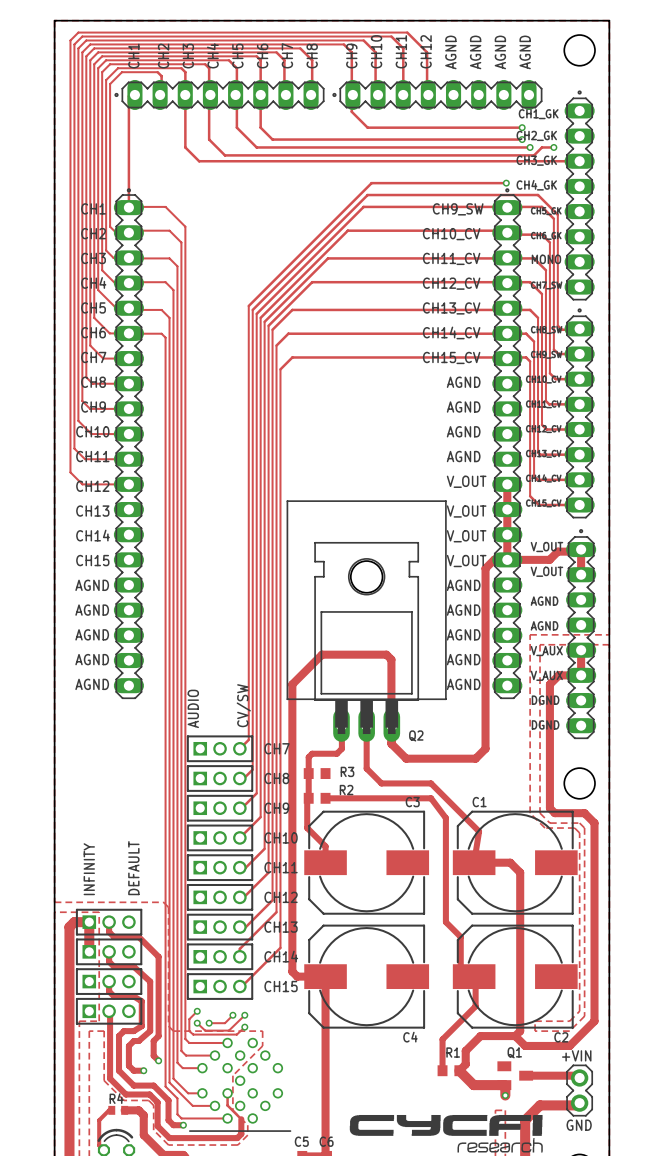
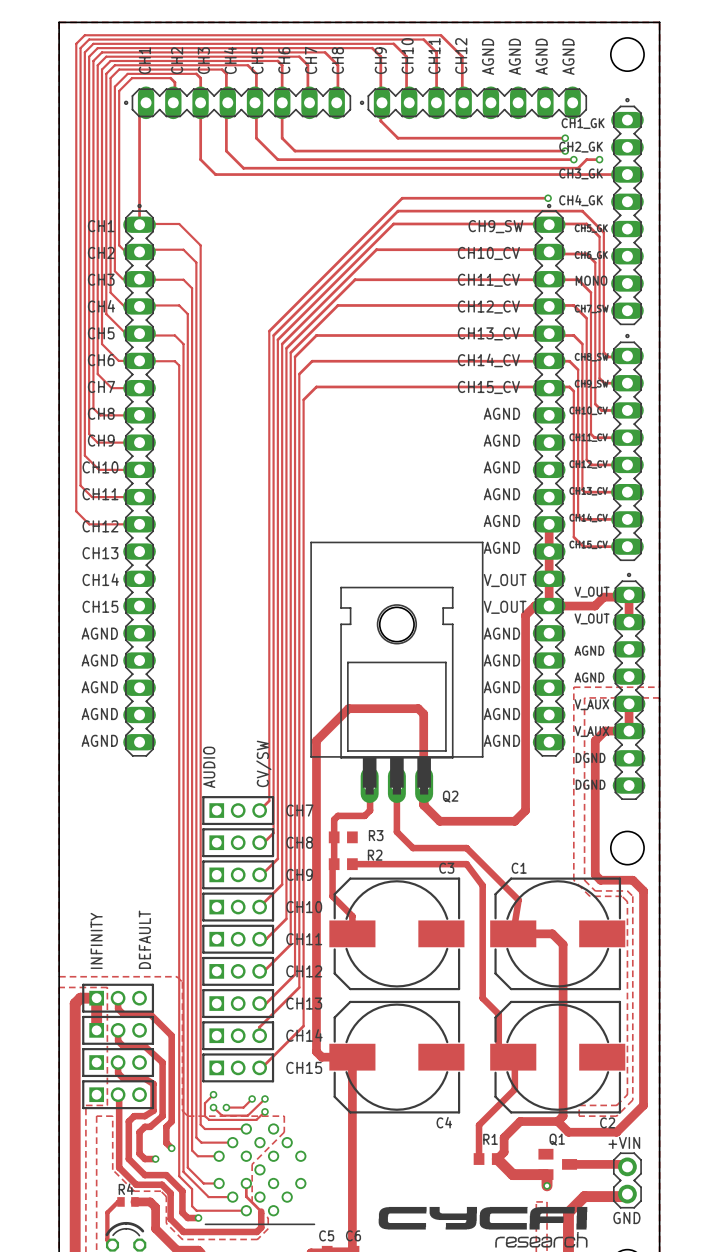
text: V_OUT (466, 481) -> AGND (501, 521)
text: V_OUT (466, 511) -> AGND (501, 547)

